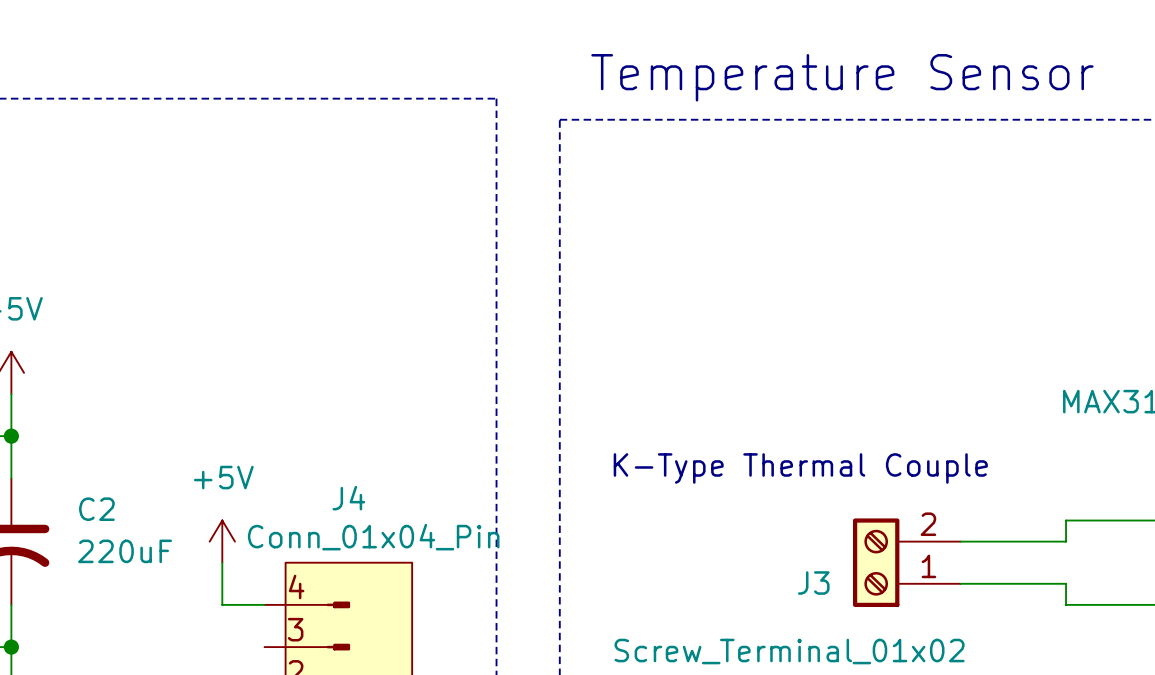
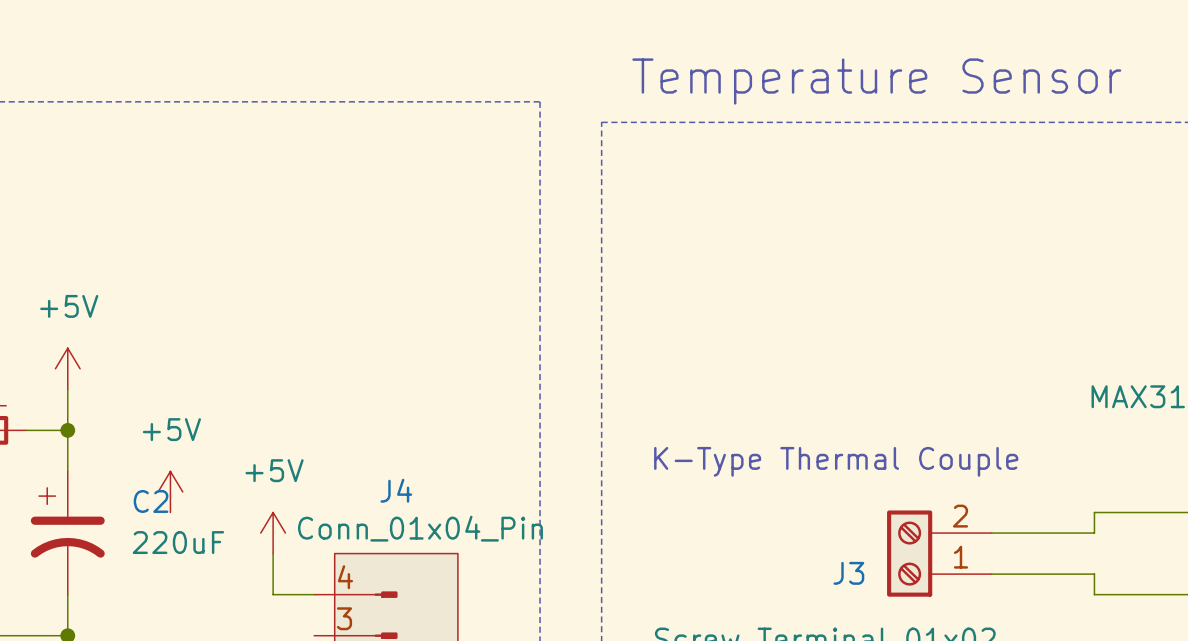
power symbol: none -> +5V (170, 491)

